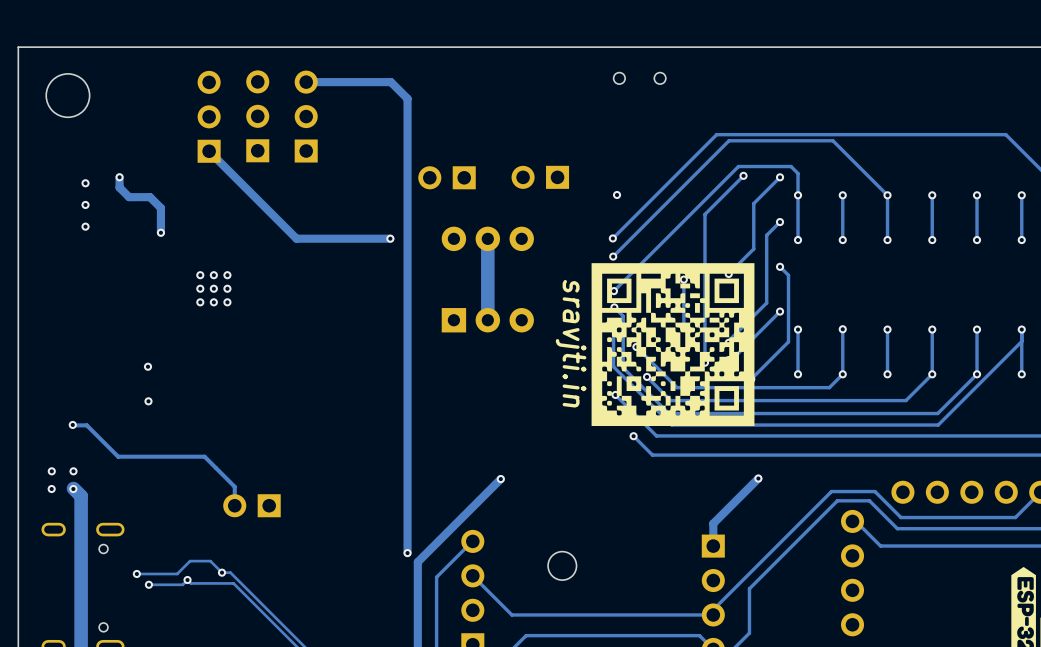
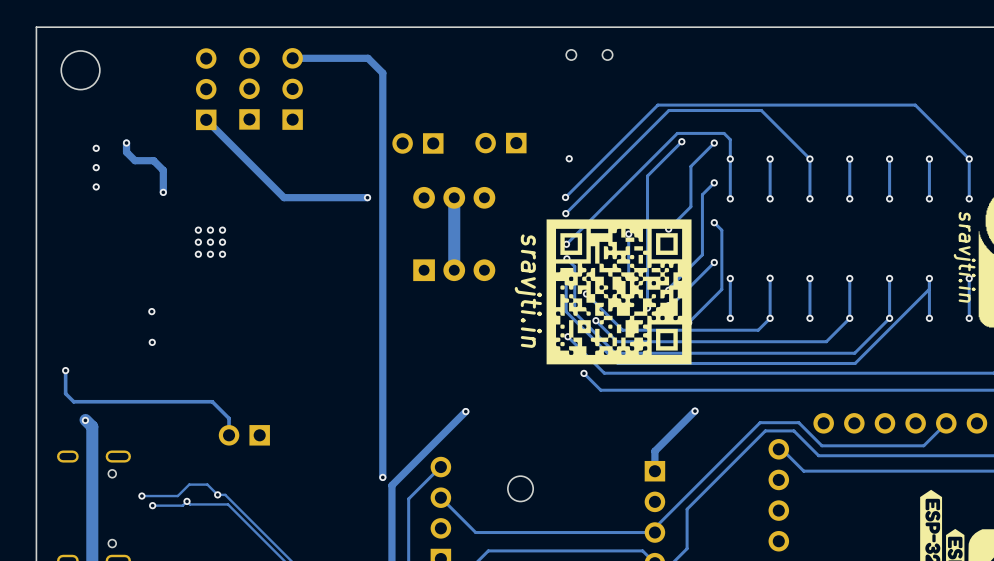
track: (72, 424) (86, 425) (118, 456) (204, 456) (216, 468) -> (65, 370) (65, 393) (73, 401) (212, 401)
via: (72, 424) -> none
via: none -> (65, 370)
via: (51, 471) -> none
via: (73, 471) -> none
via: (51, 489) -> none

